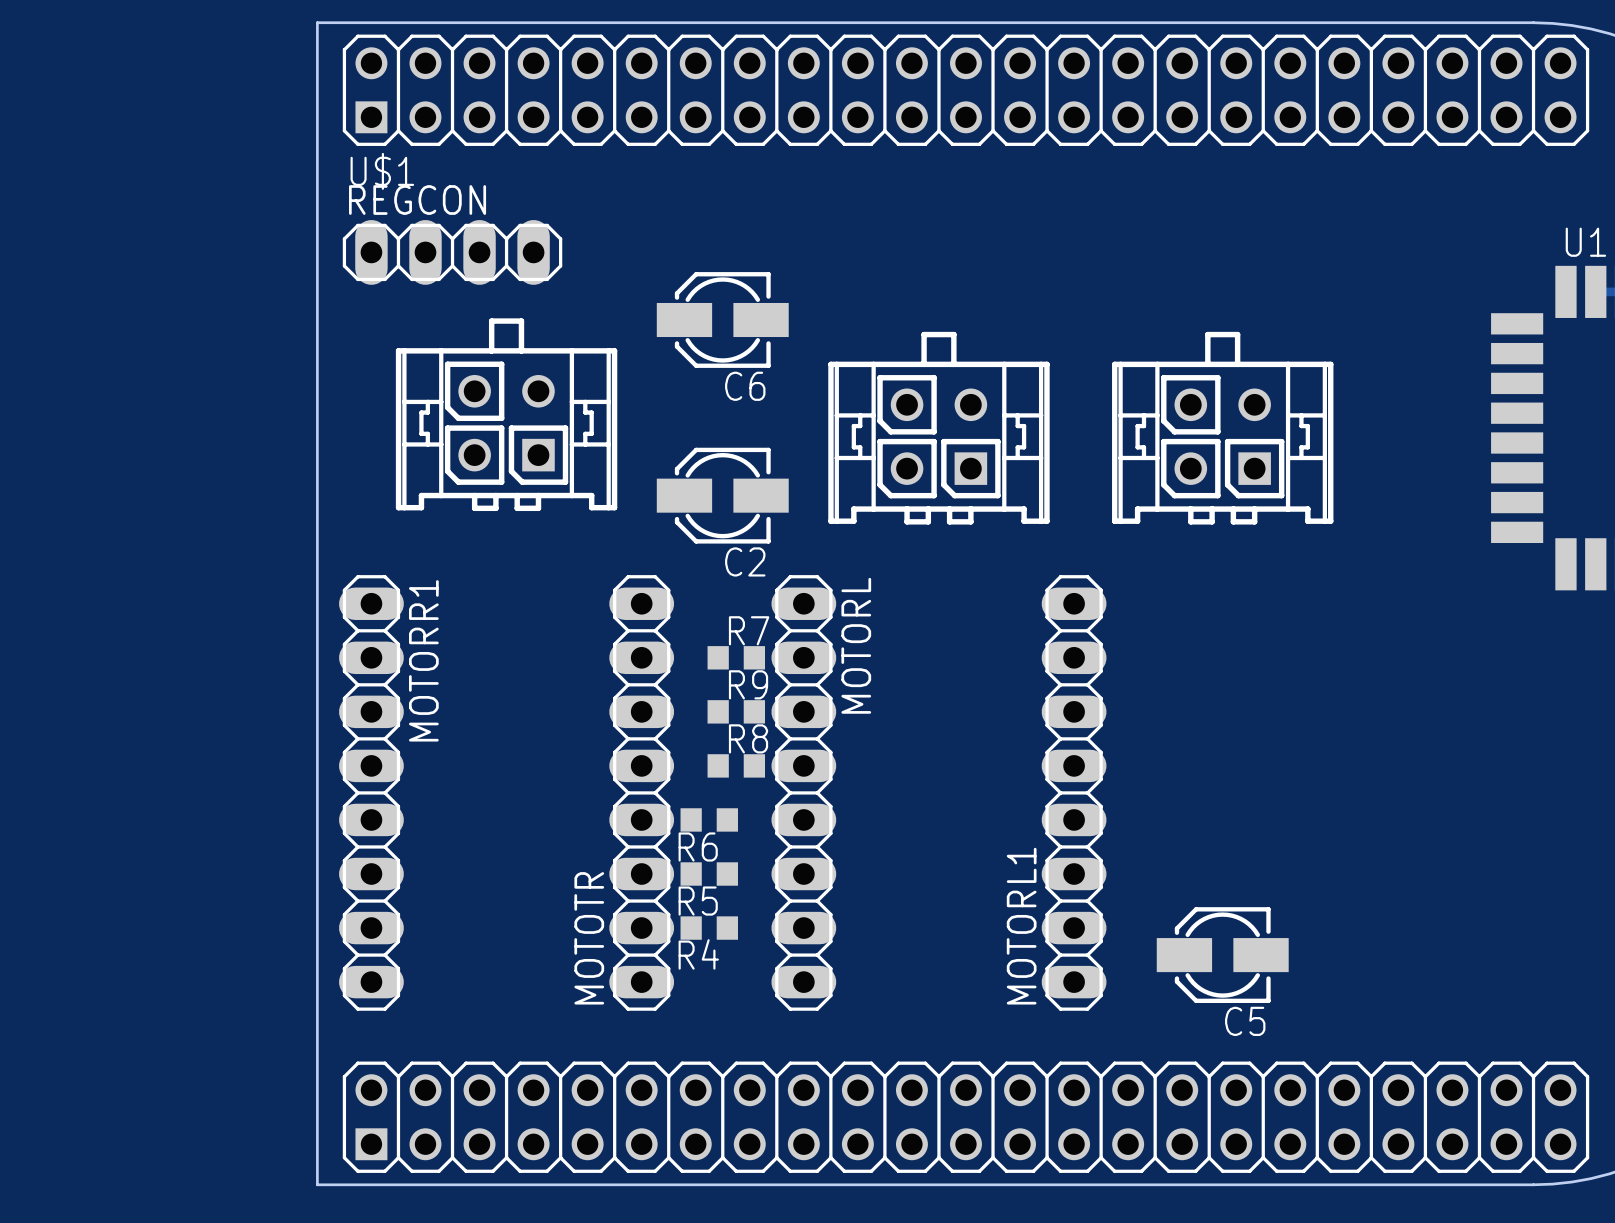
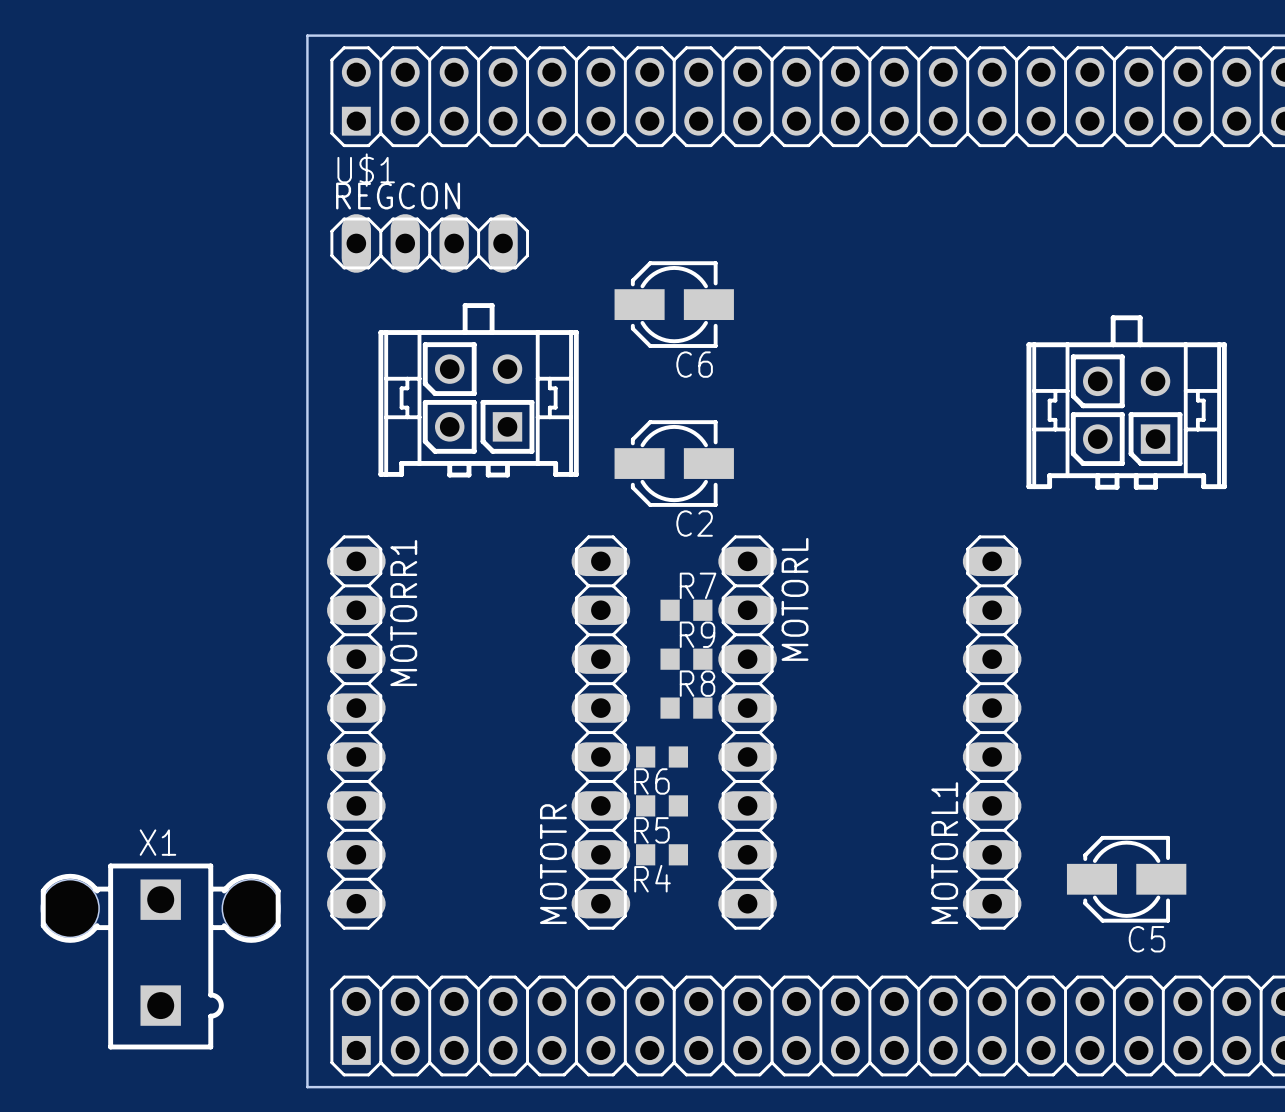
part: (938, 428) -> none
X1: none -> (160, 956)

